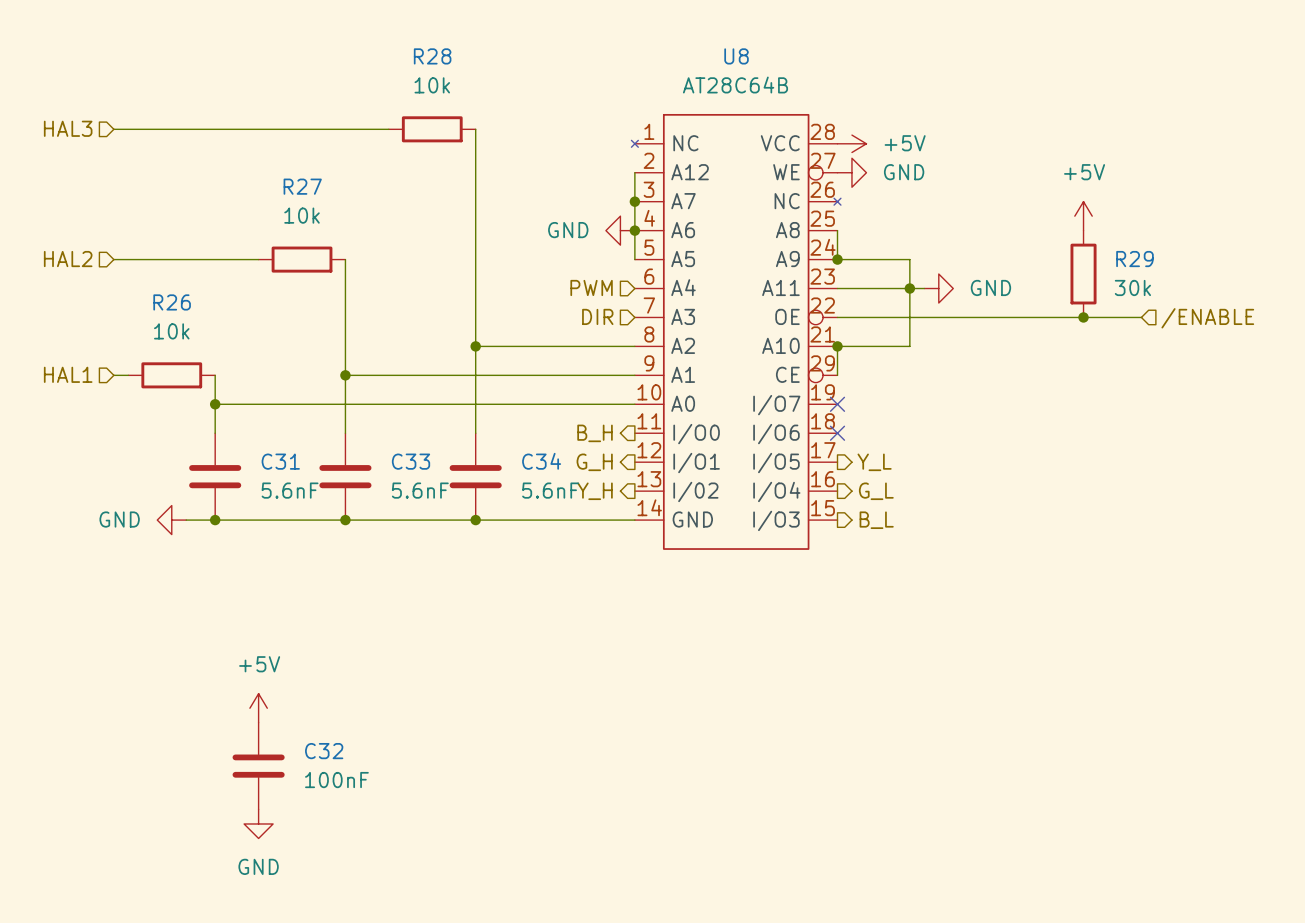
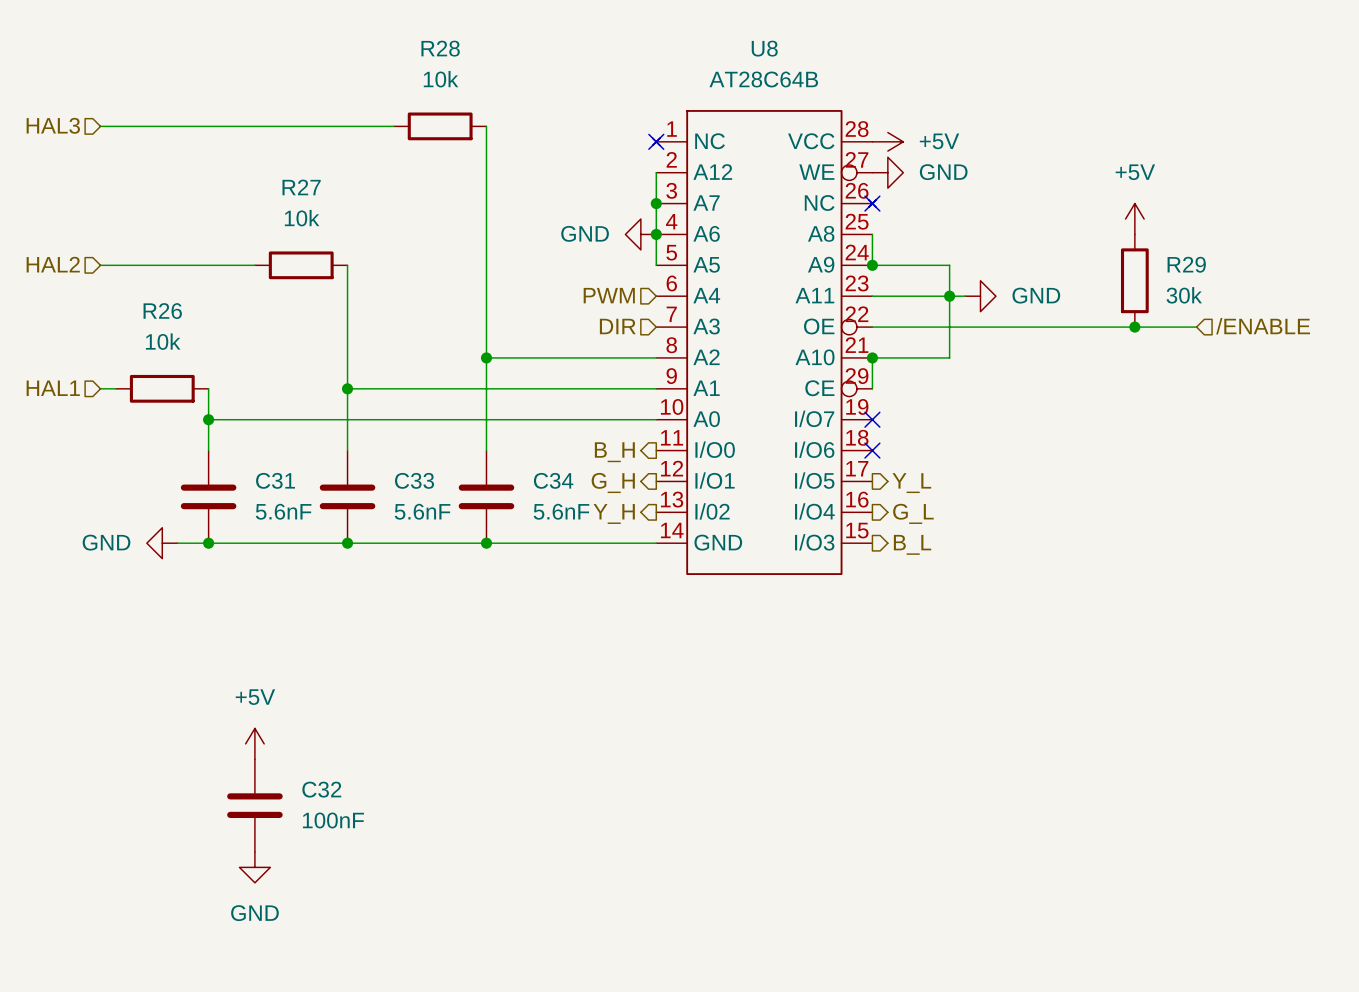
no-connect mark: none -> (656, 141)
no-connect mark: none -> (872, 203)

